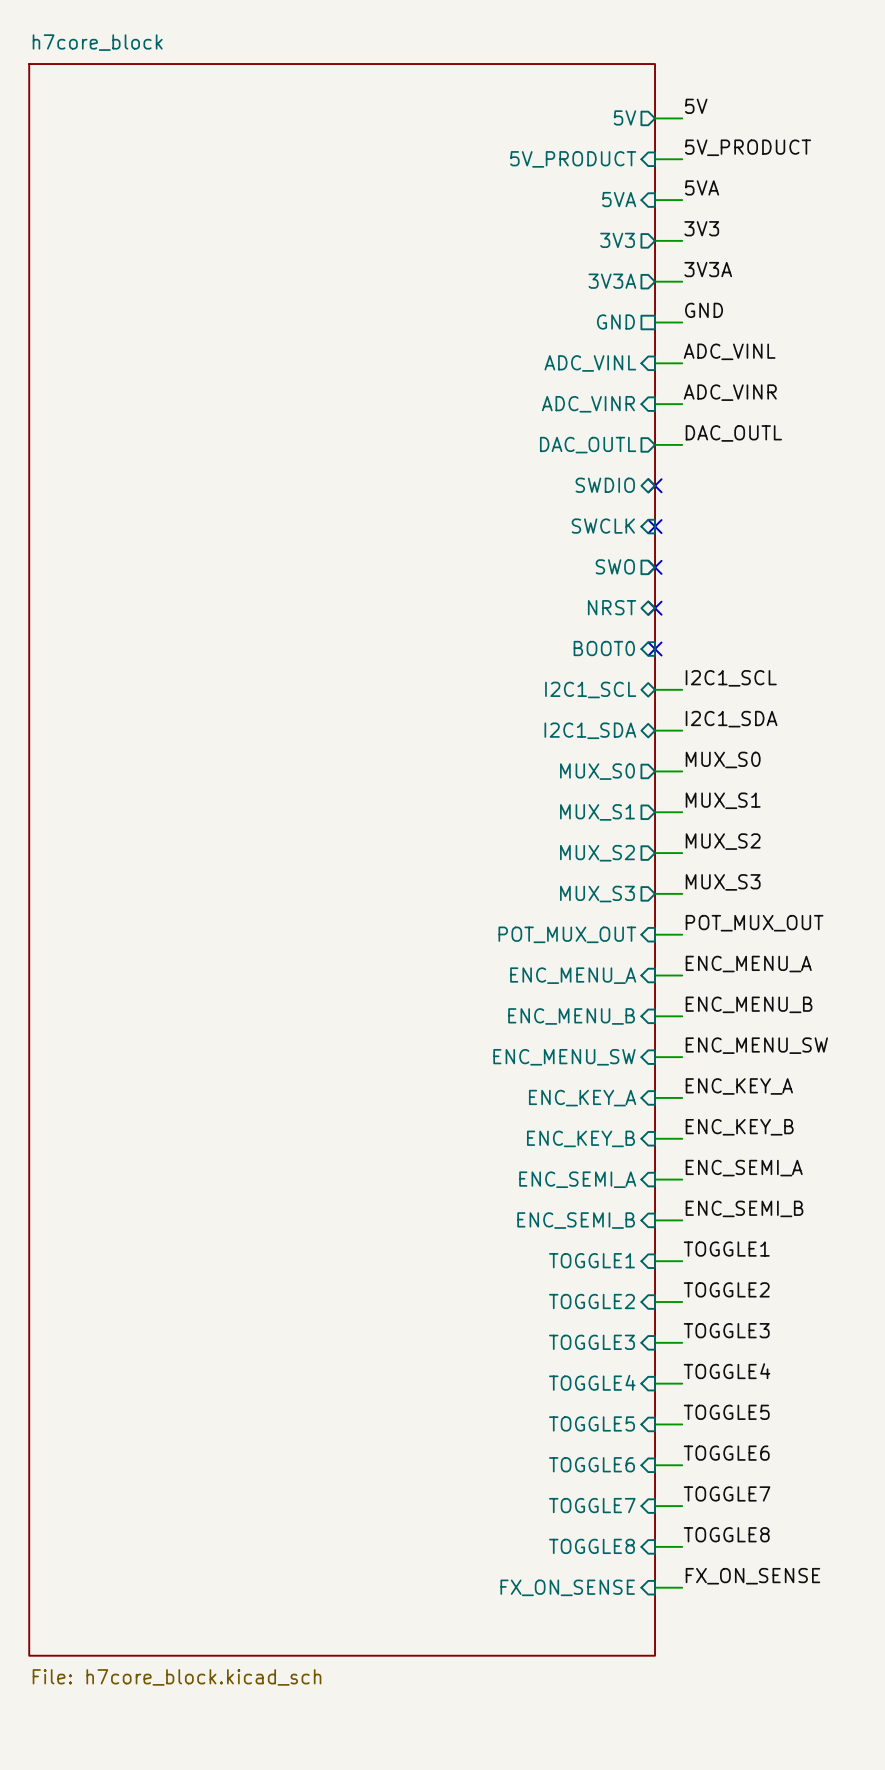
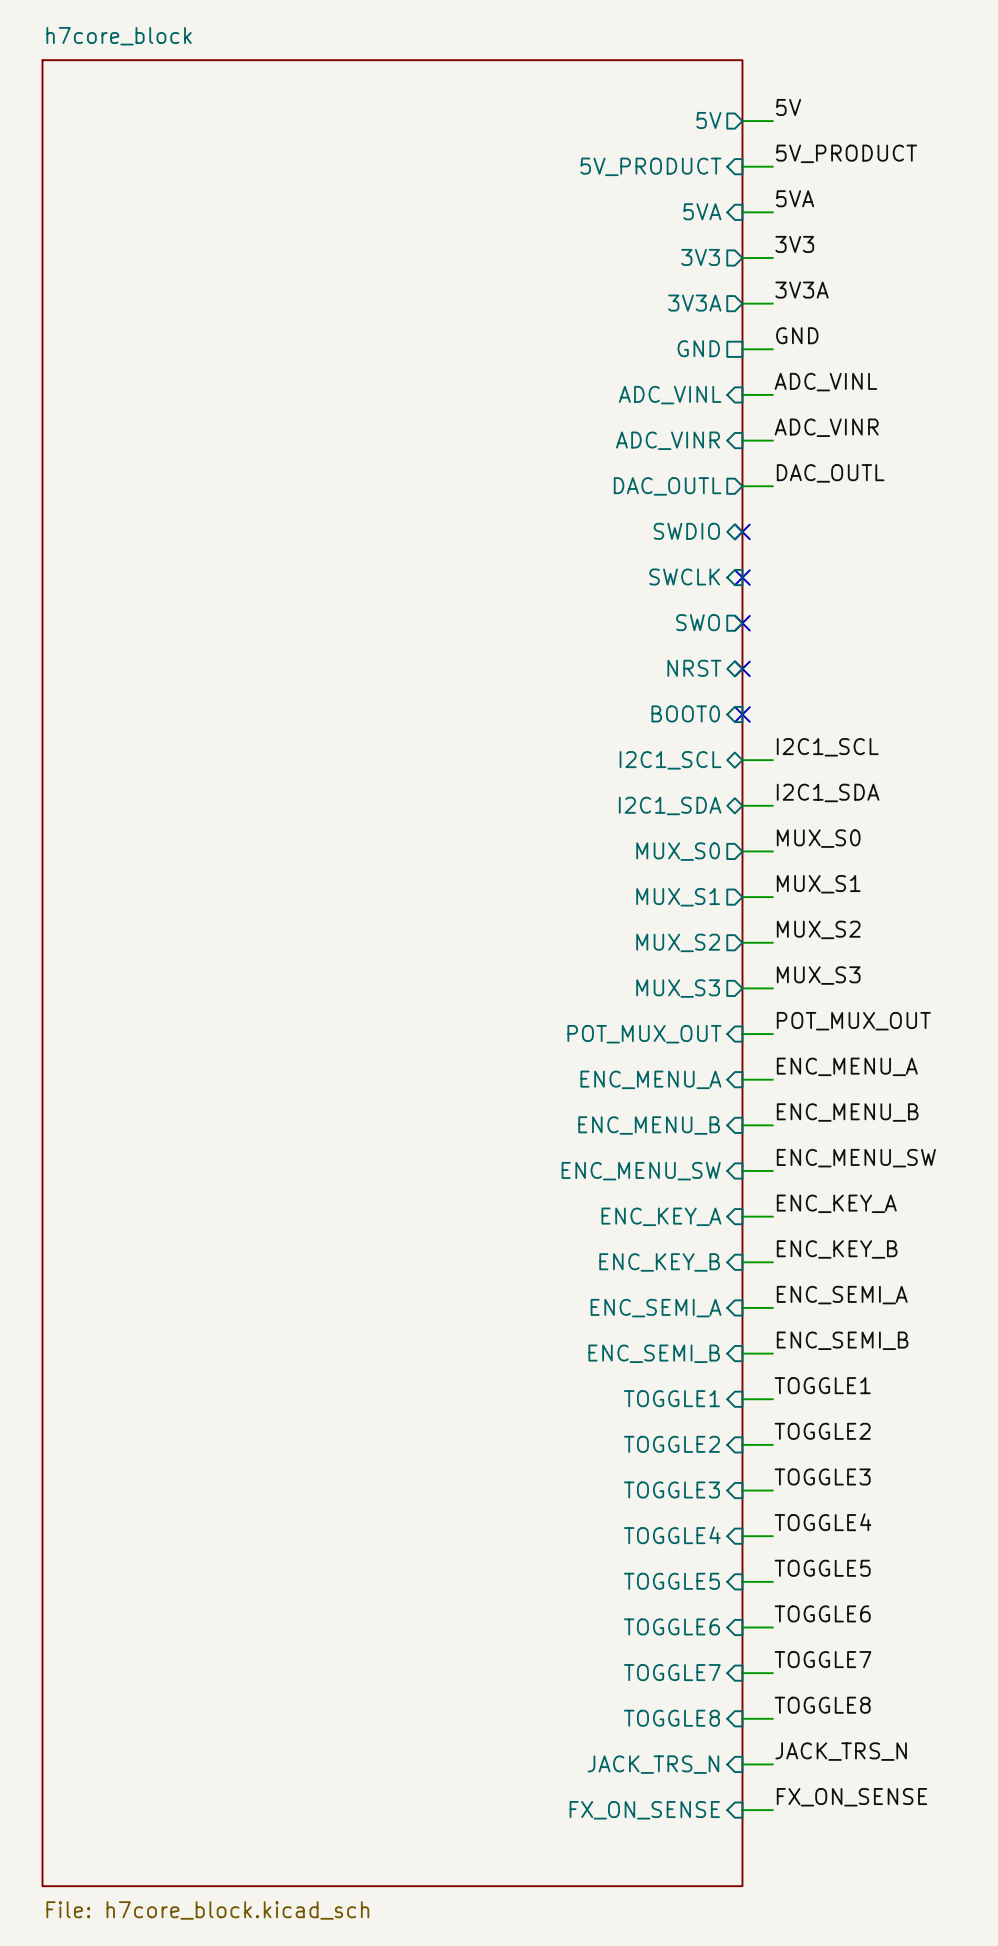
sheet h7core_block shape: [28, 63, 656, 1657] -> [41, 59, 744, 1888]
label: FX_ON_SENSE (752, 1576) -> JACK_TRS_N (841, 1751)
sheet pin: FX_ON_SENSE (567, 1587) -> JACK_TRS_N (653, 1764)
label: none -> FX_ON_SENSE (852, 1797)
sheet pin: none -> FX_ON_SENSE (644, 1810)
wire: none -> (742, 1810) (772, 1810)

